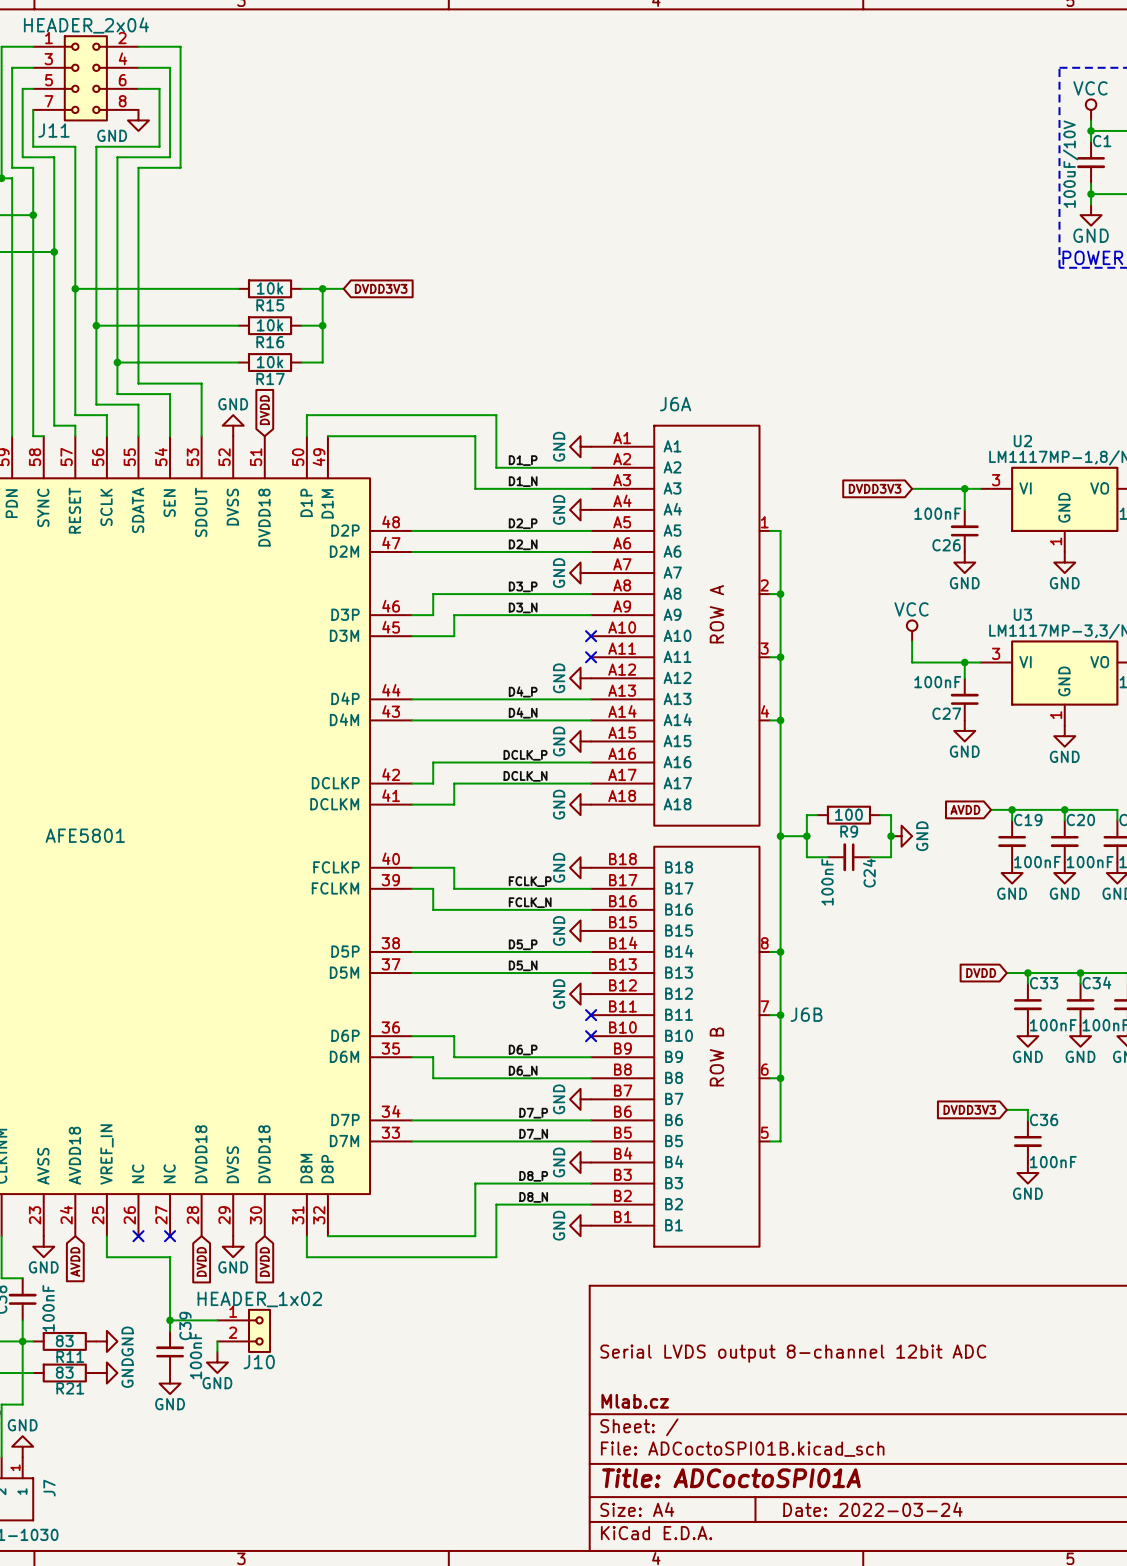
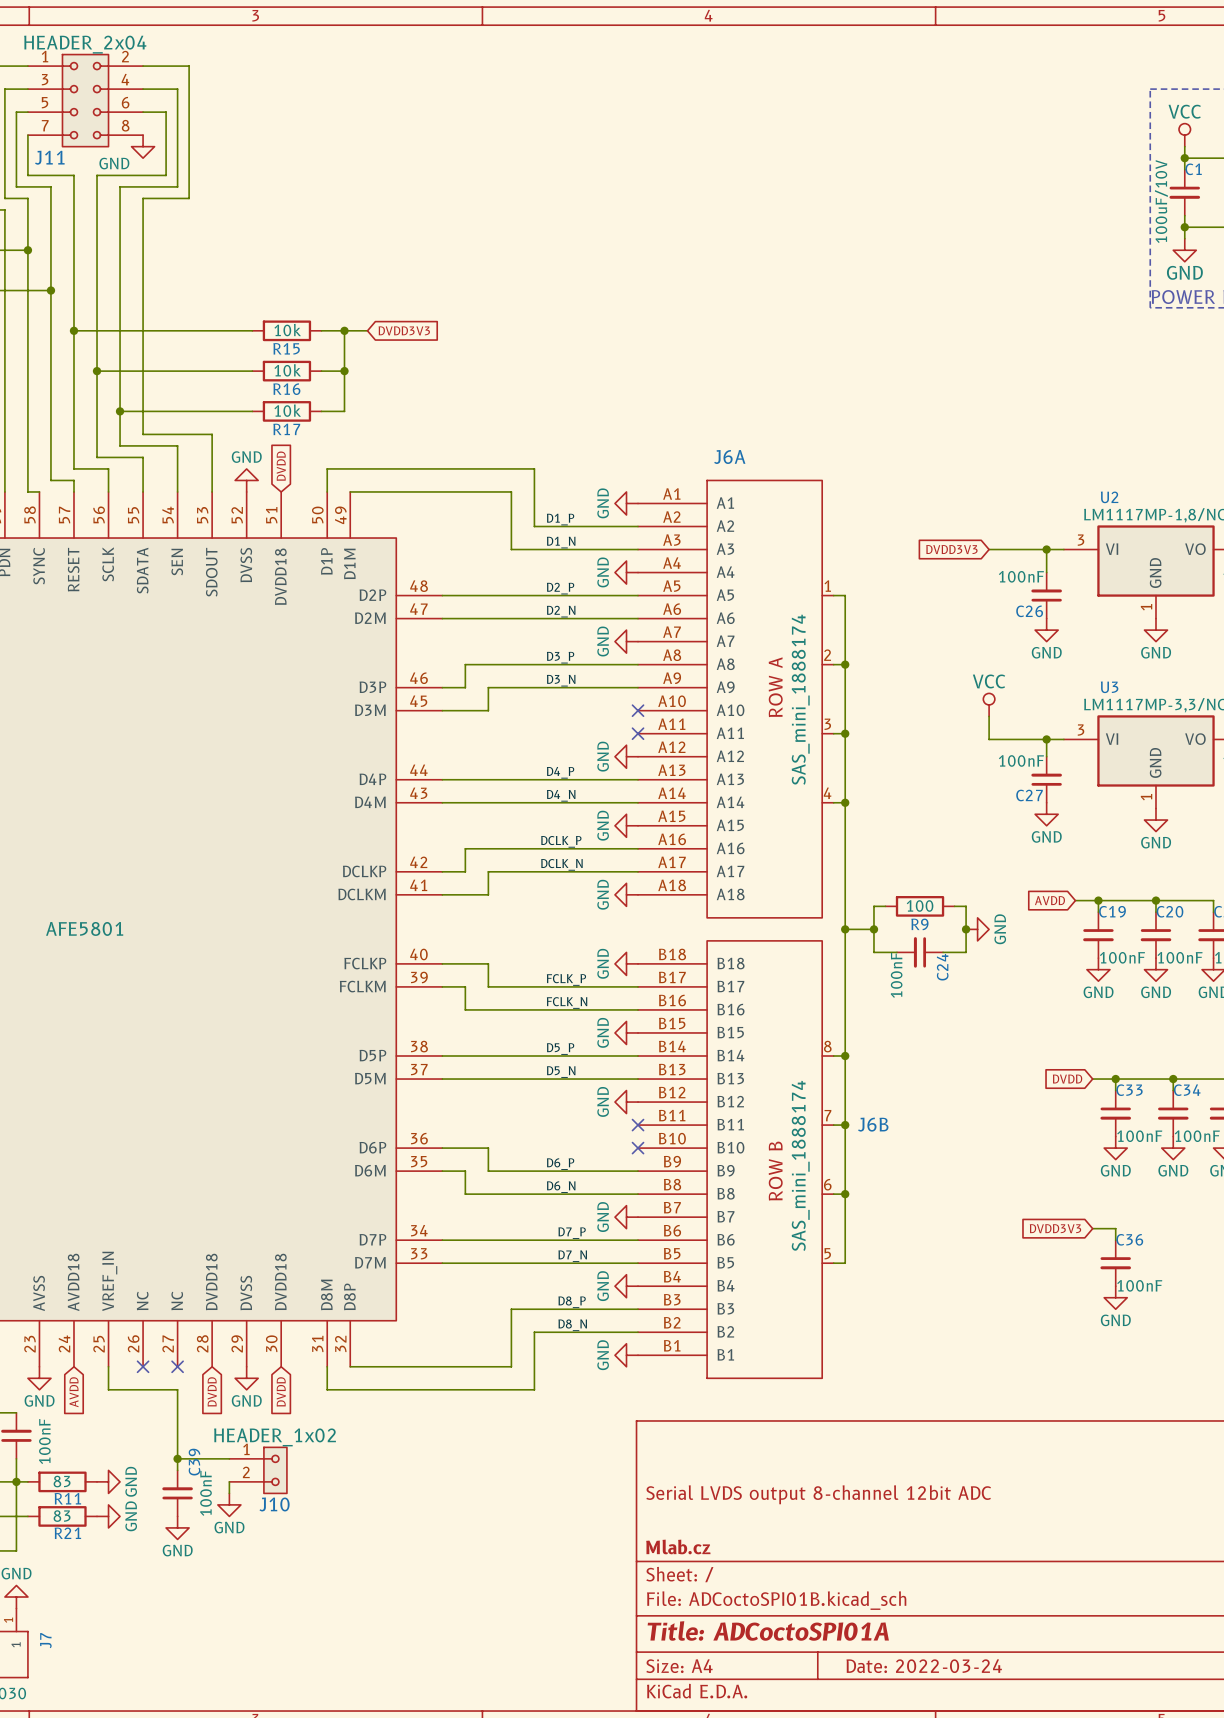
J6A value: none -> SAS_mini_1888174 (800, 699)
J6B value: none -> SAS_mini_1888174 (800, 1165)

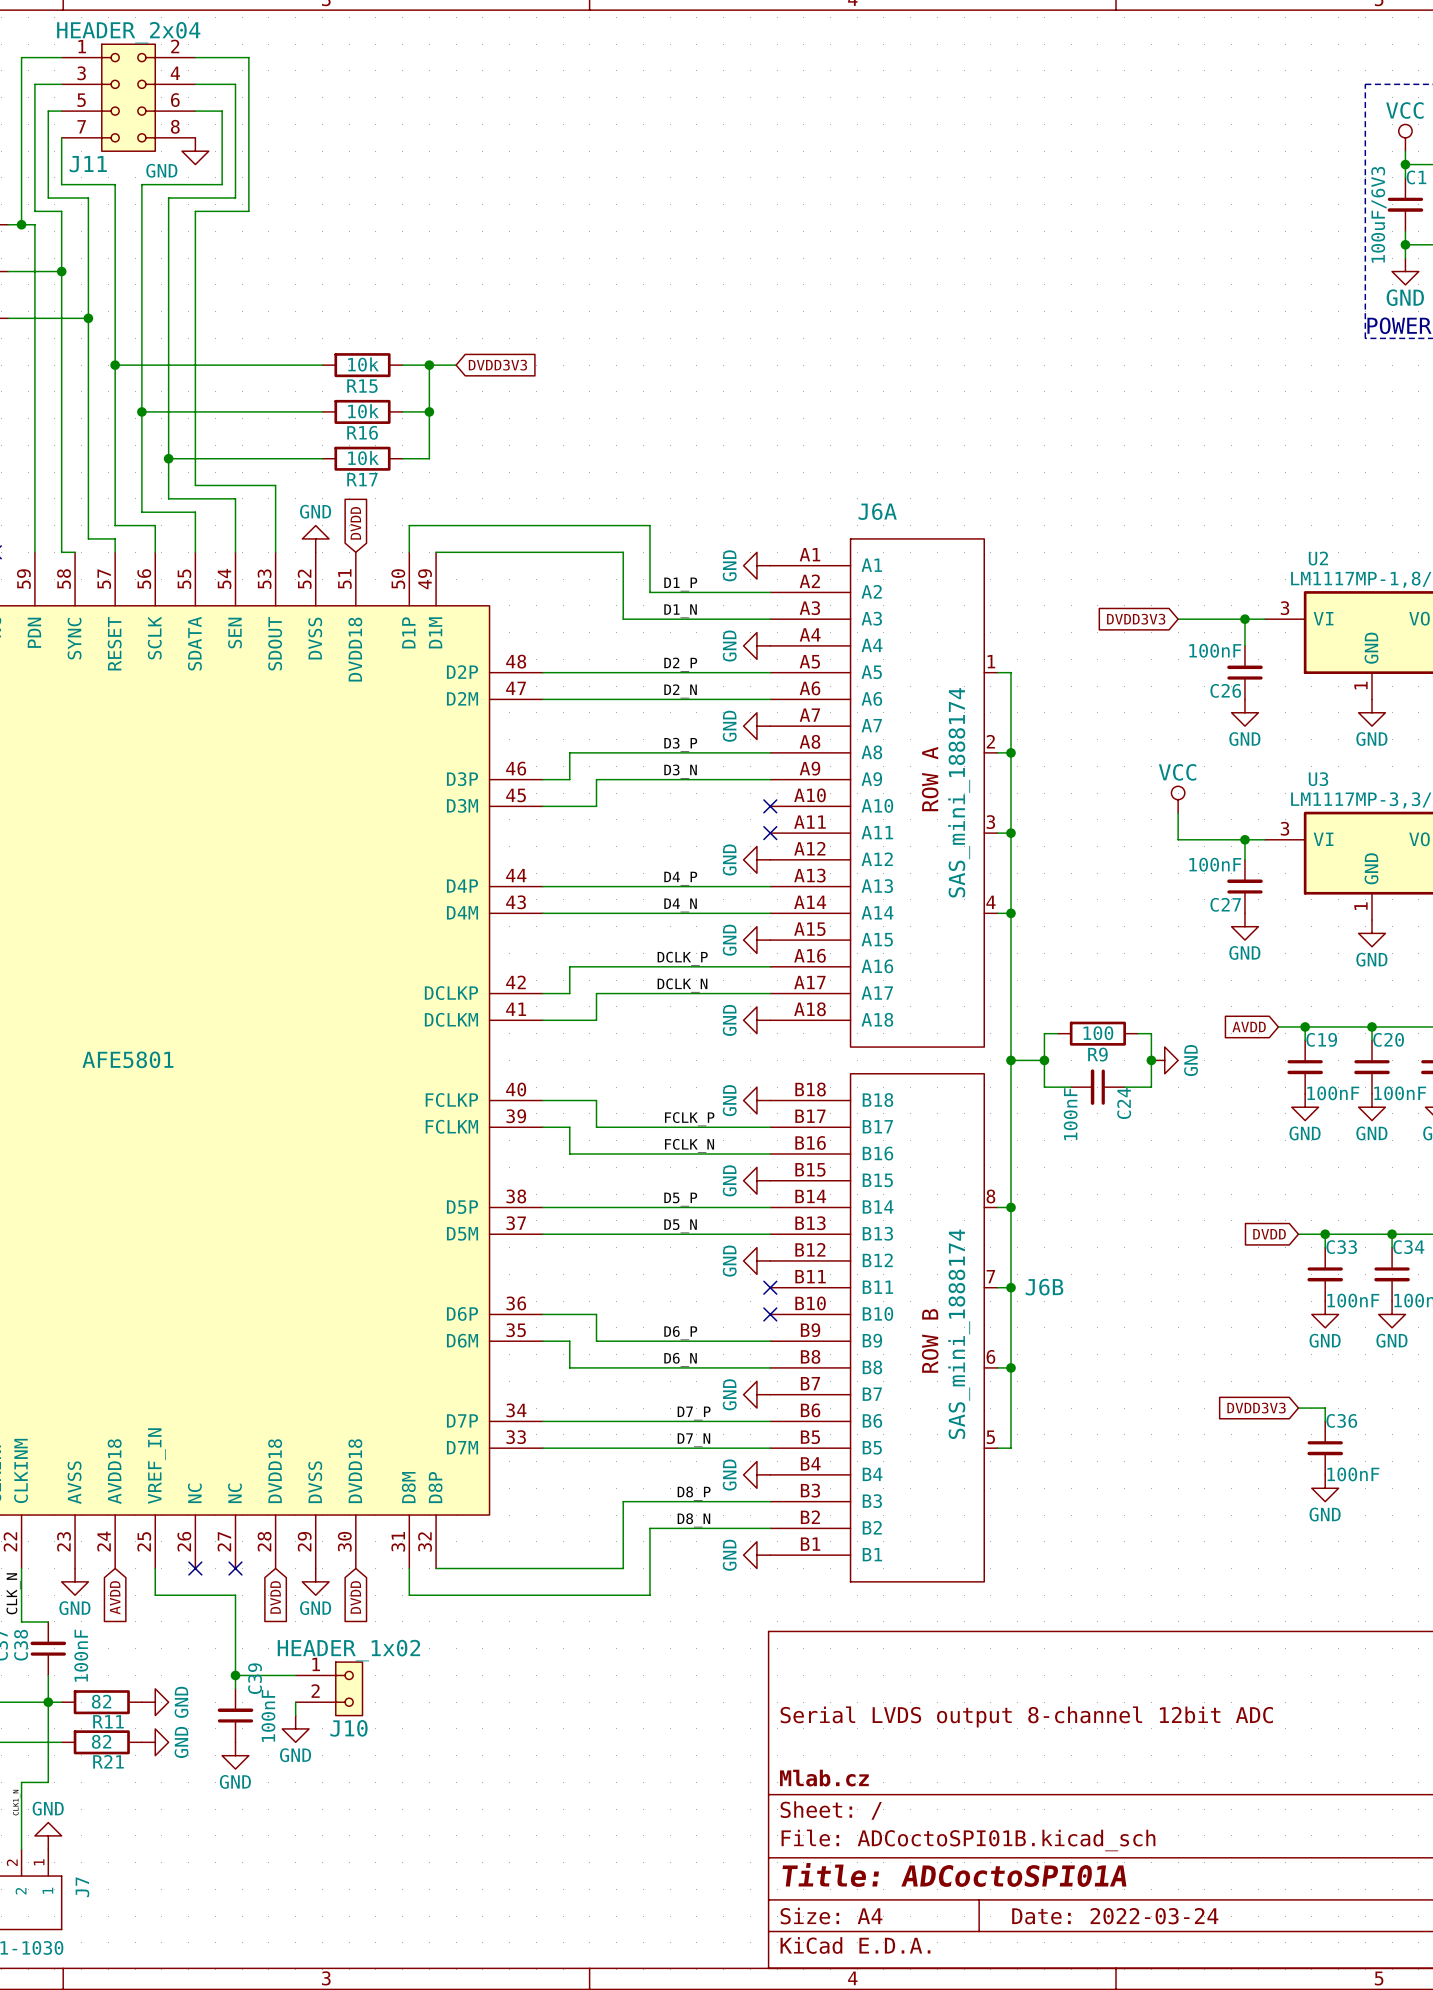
C1 value: 100uF/10V (1161, 201) -> 100uF/6V3 (1378, 214)
R11 value: 83 (62, 1481) -> 82 (101, 1701)
R21 value: 83 (62, 1516) -> 82 (101, 1741)

